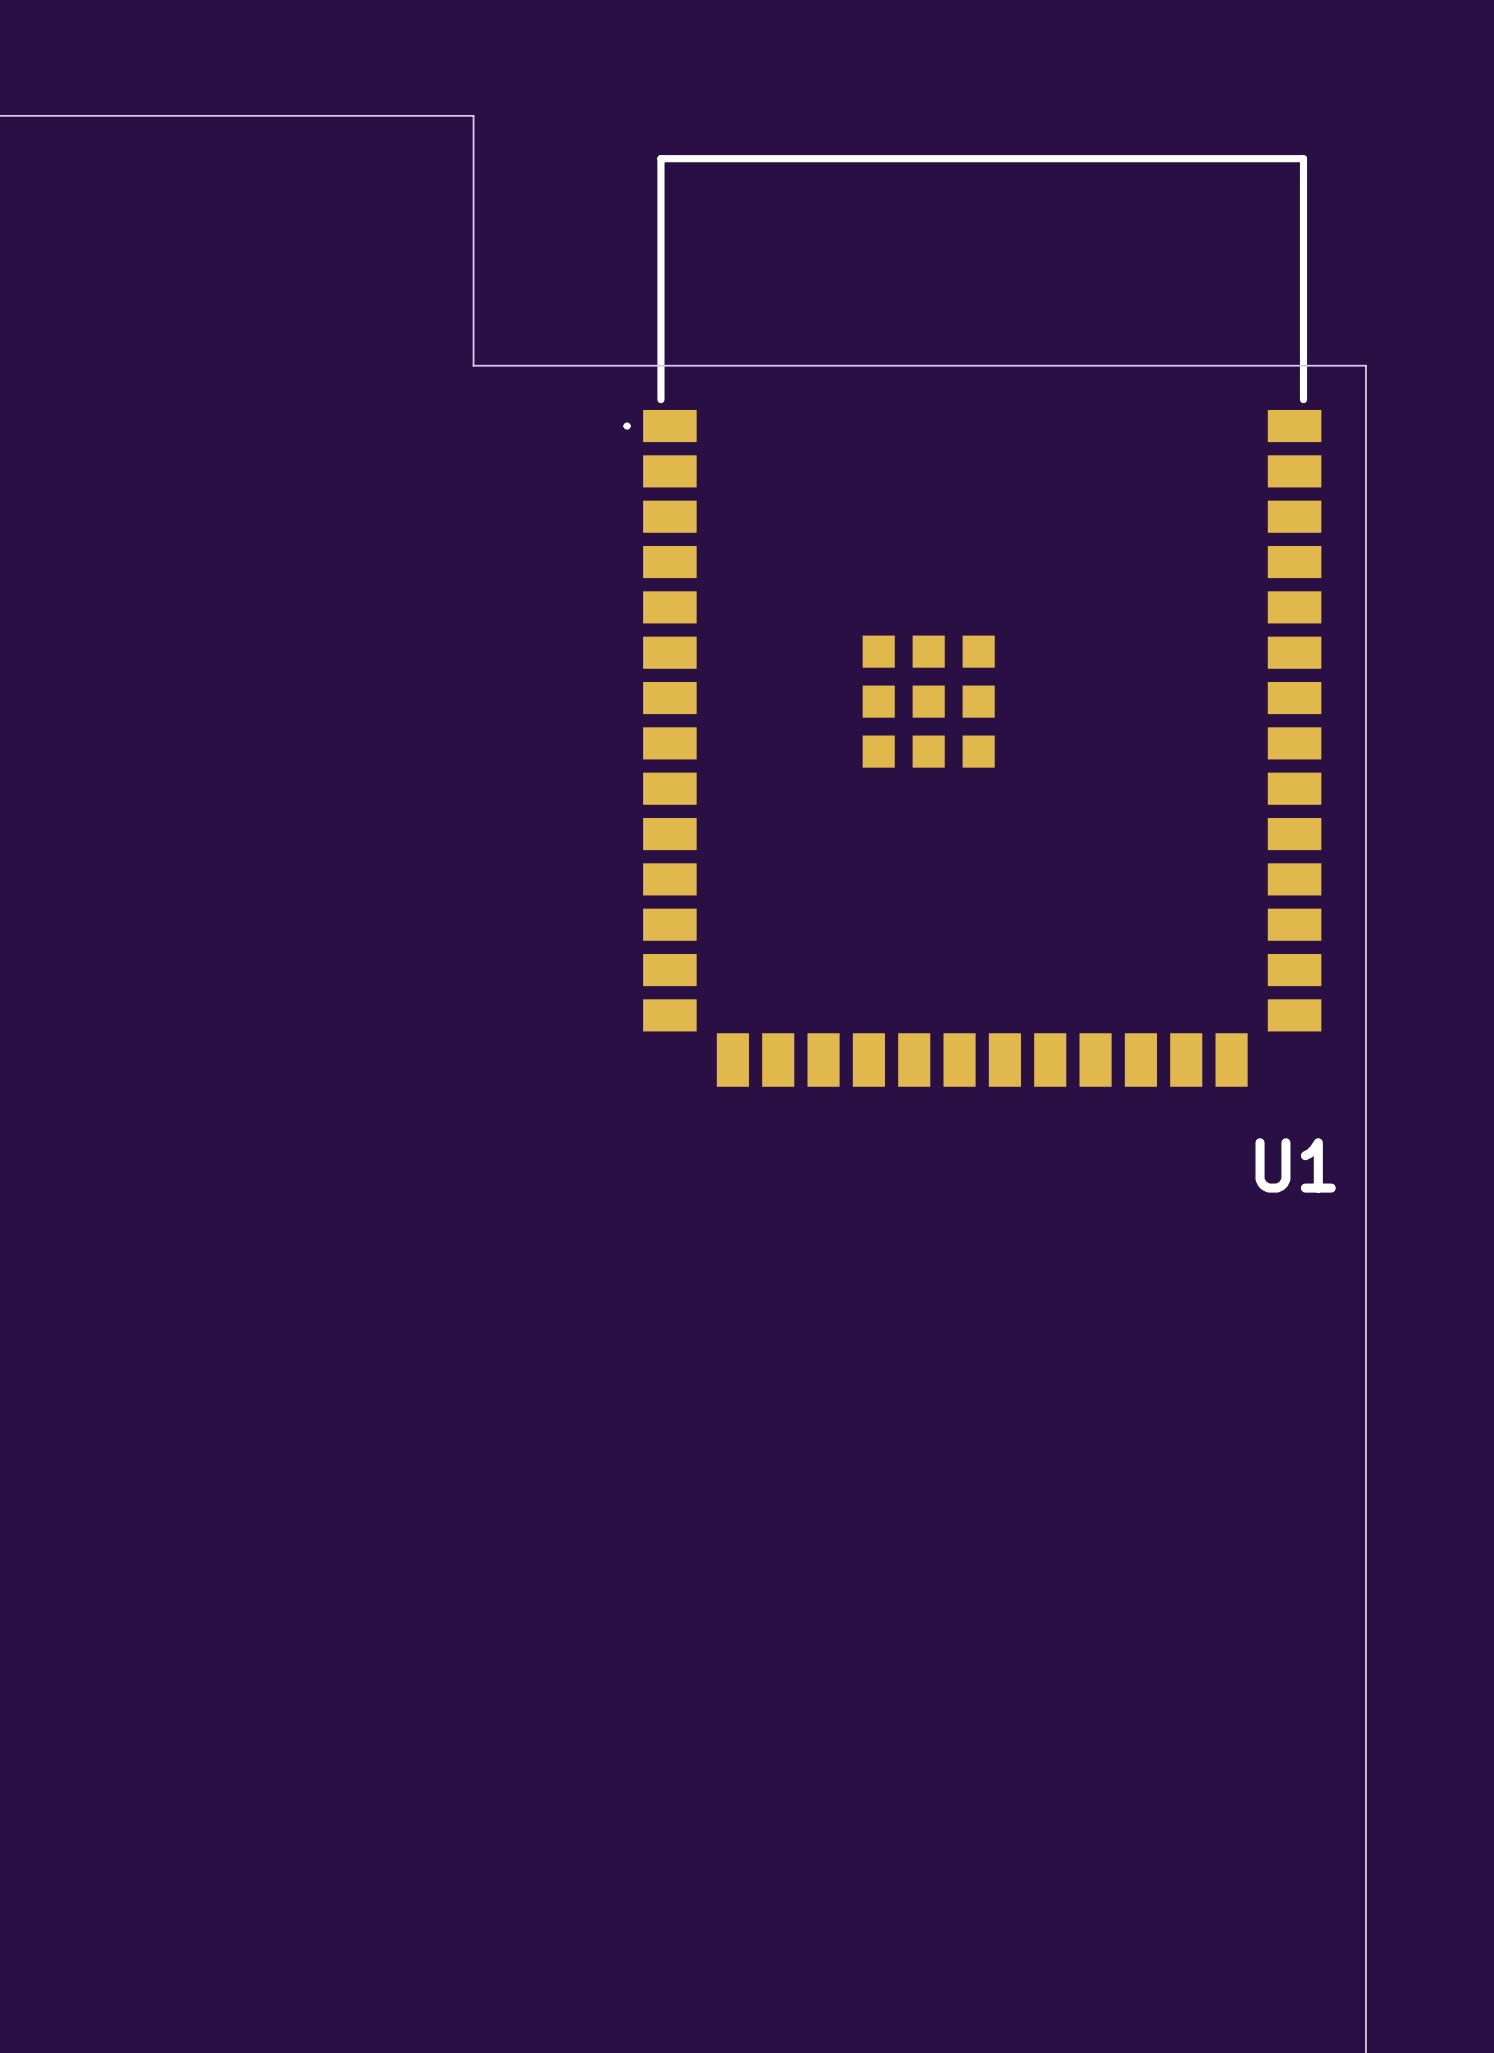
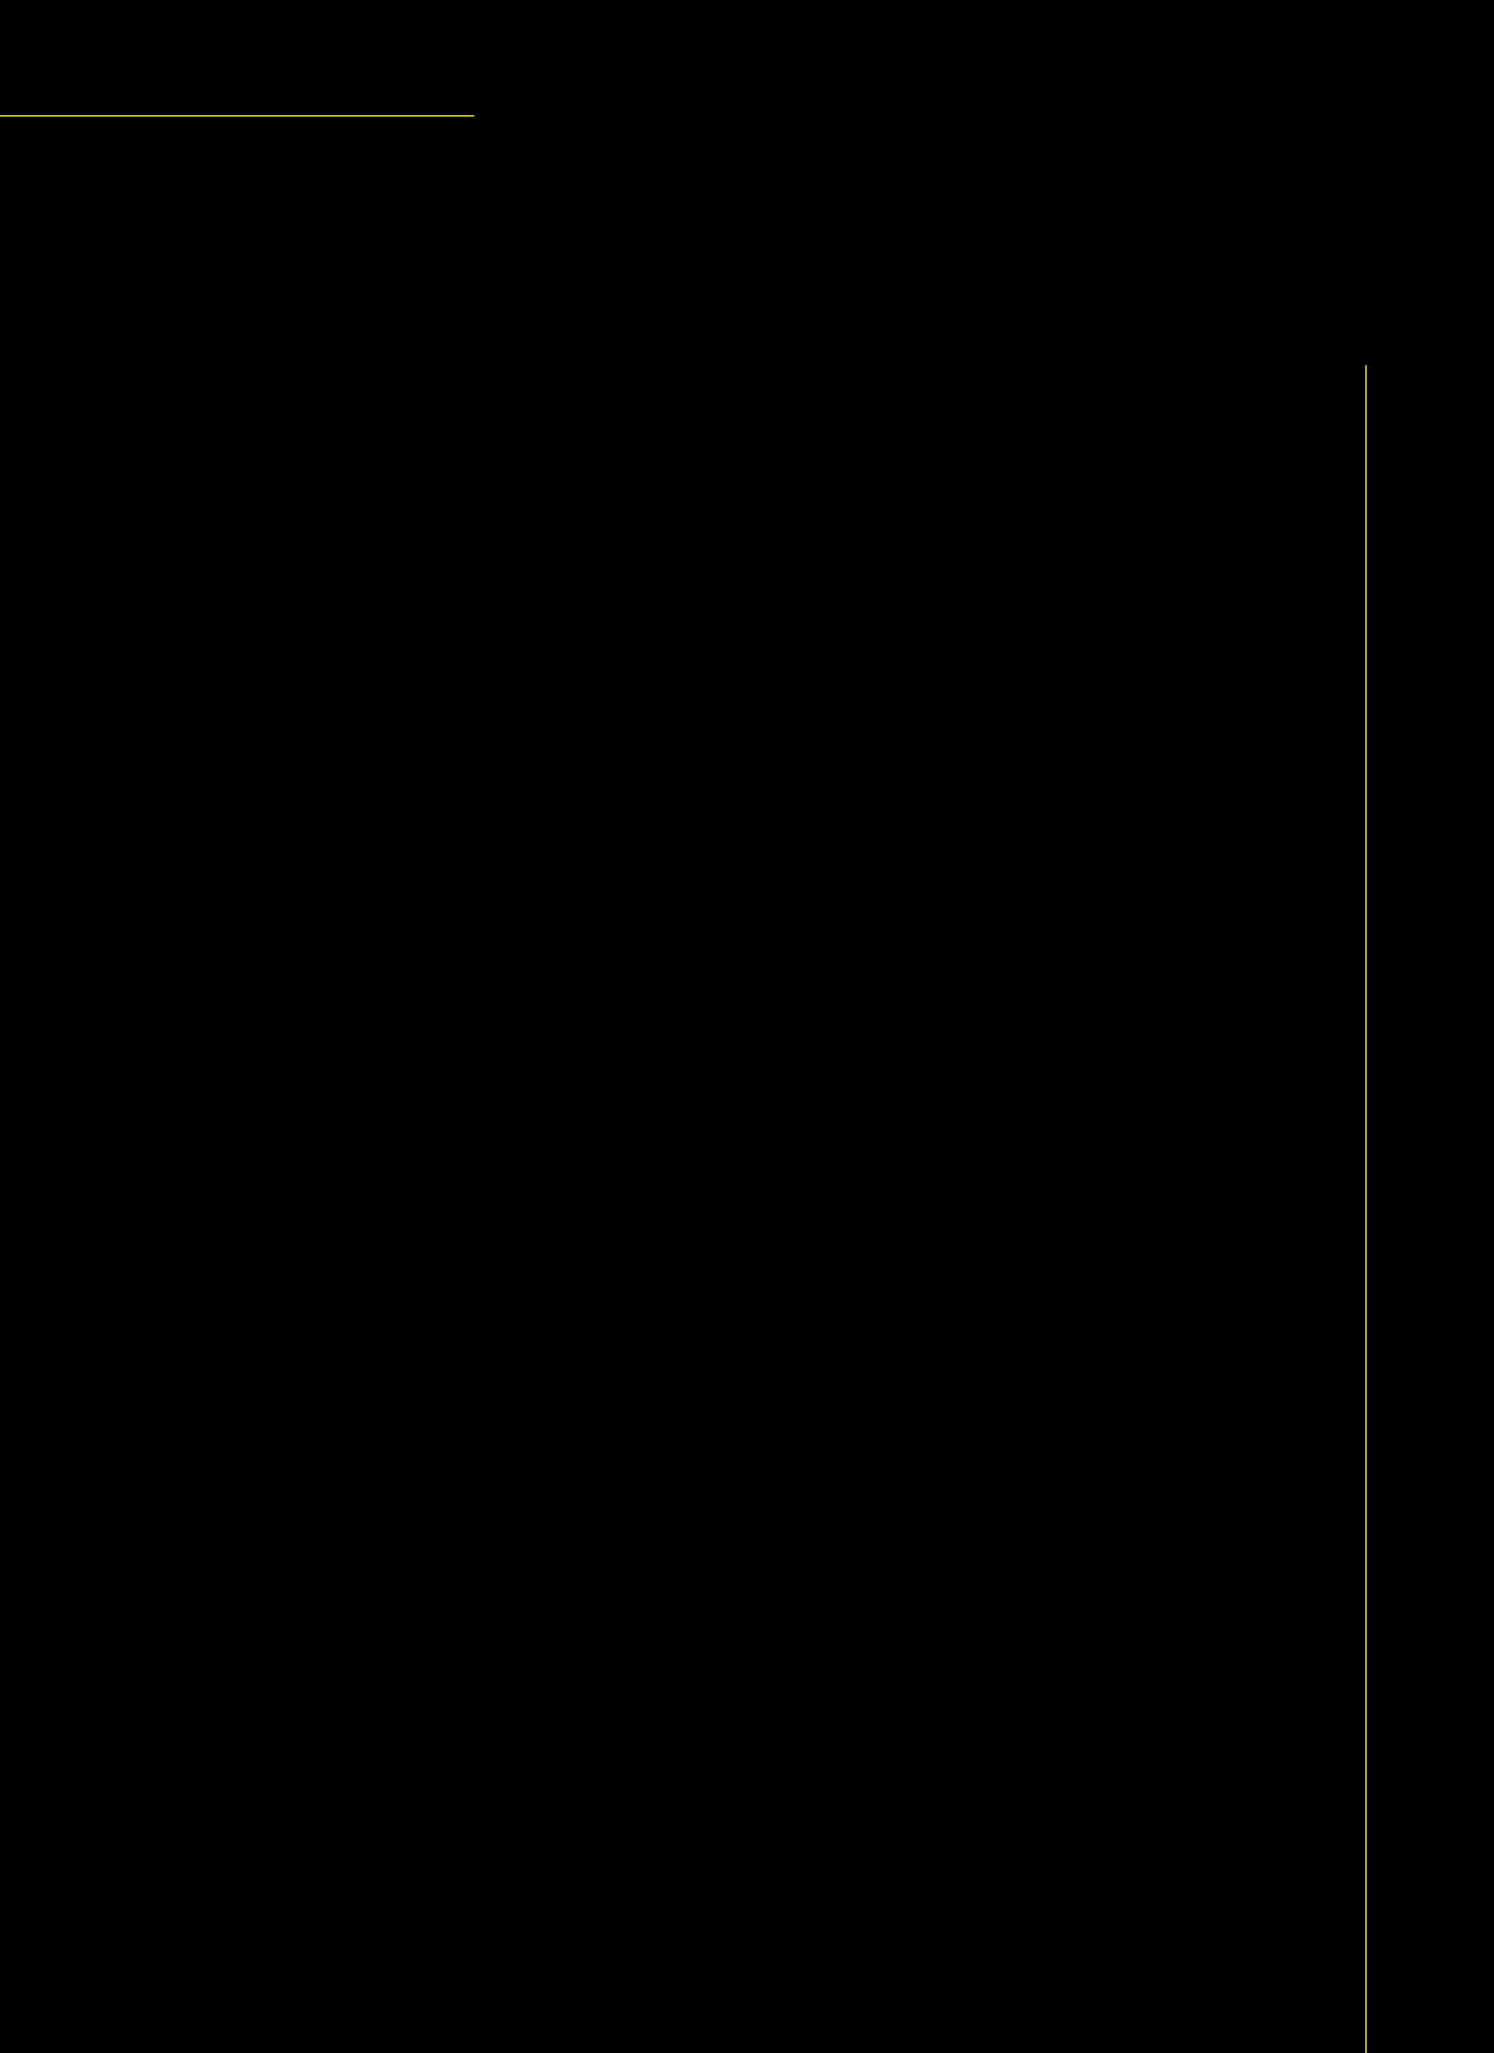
board edge: (473, 115) (473, 365) (1365, 365) -> none
U1: (972, 620) -> none

